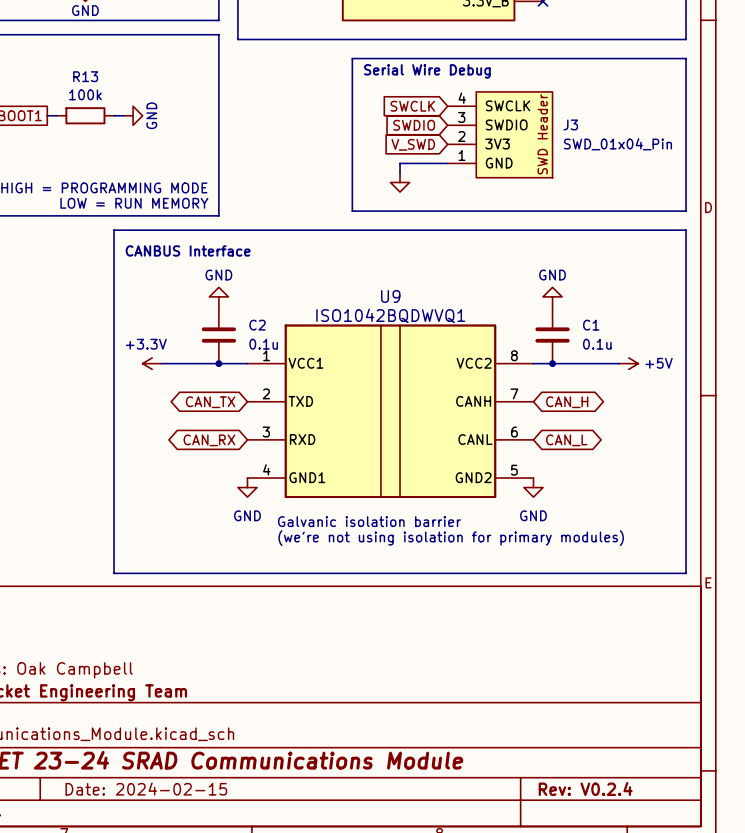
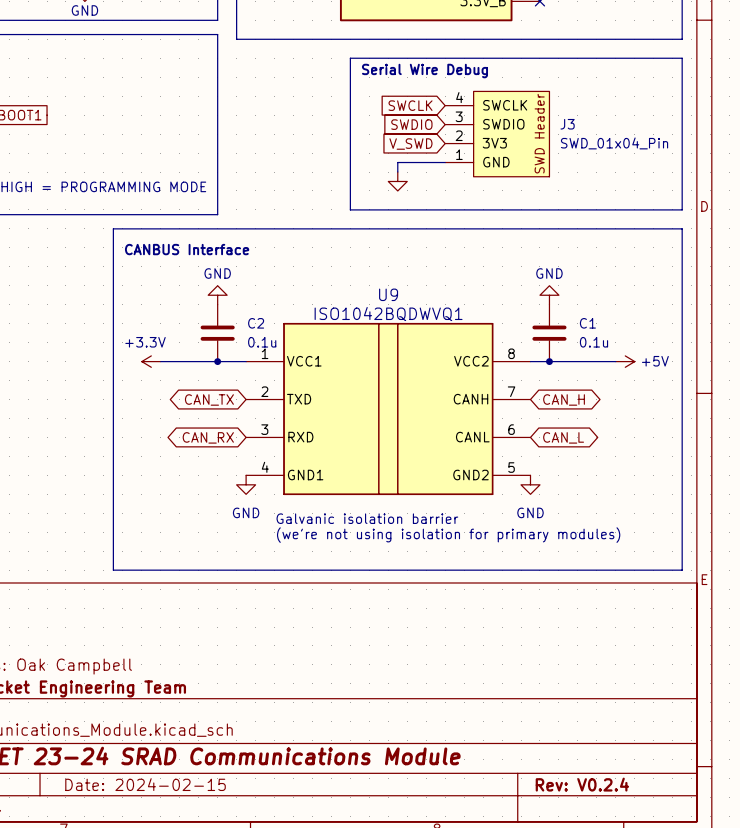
wire: (47, 115) (56, 115) -> none
R13: 100k (85, 115) -> none
wire: (114, 115) (123, 115) -> none
power symbol: GND (133, 115) -> none
text: LOW = RUN MEMORY (134, 203) -> none

